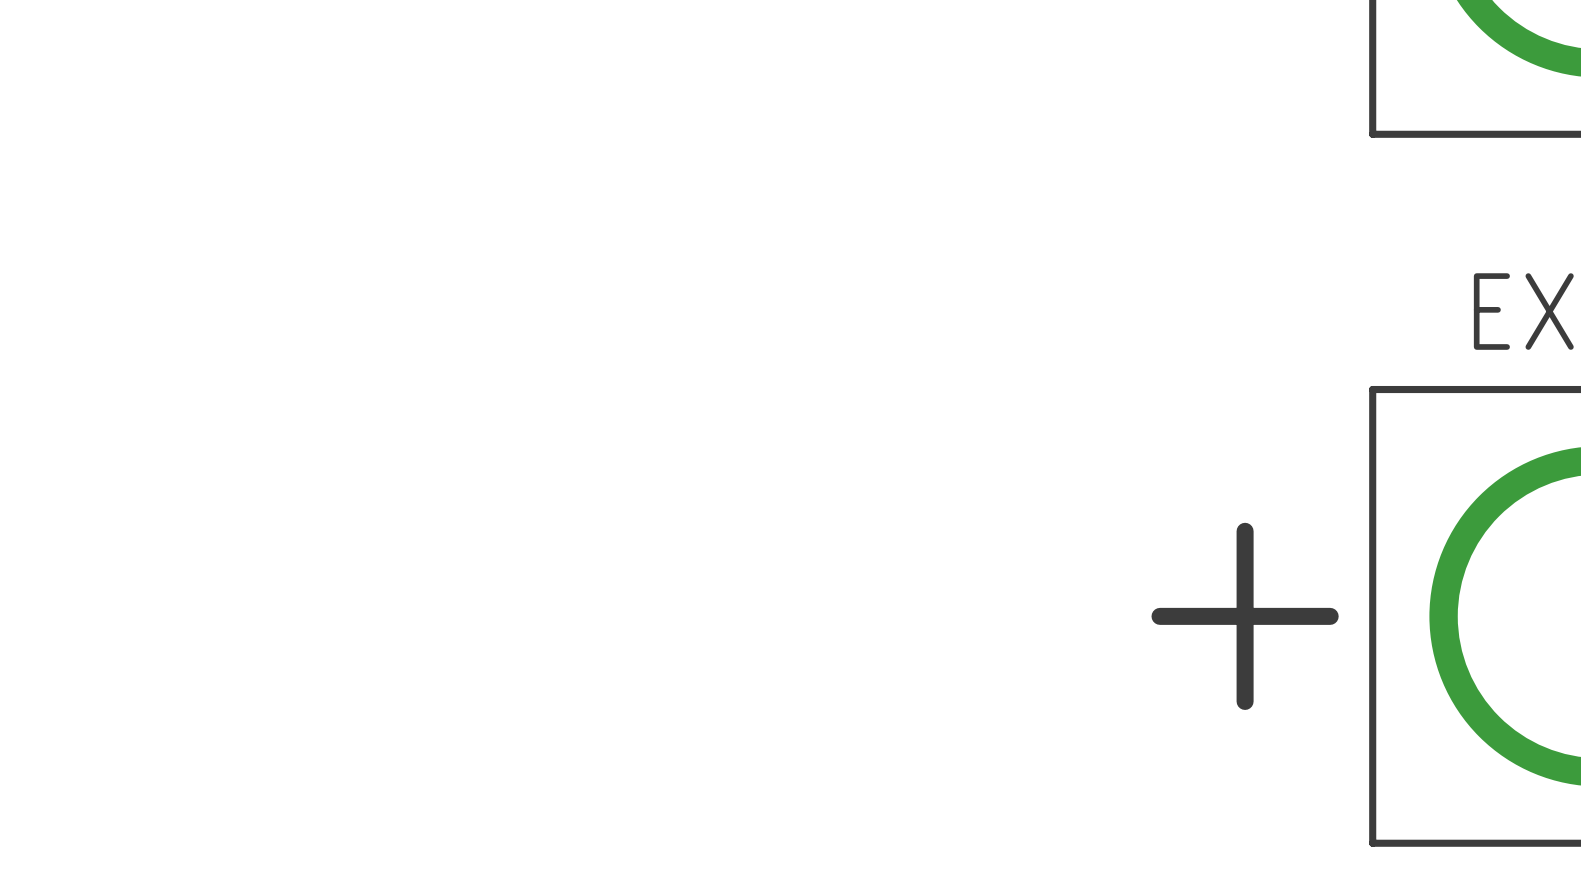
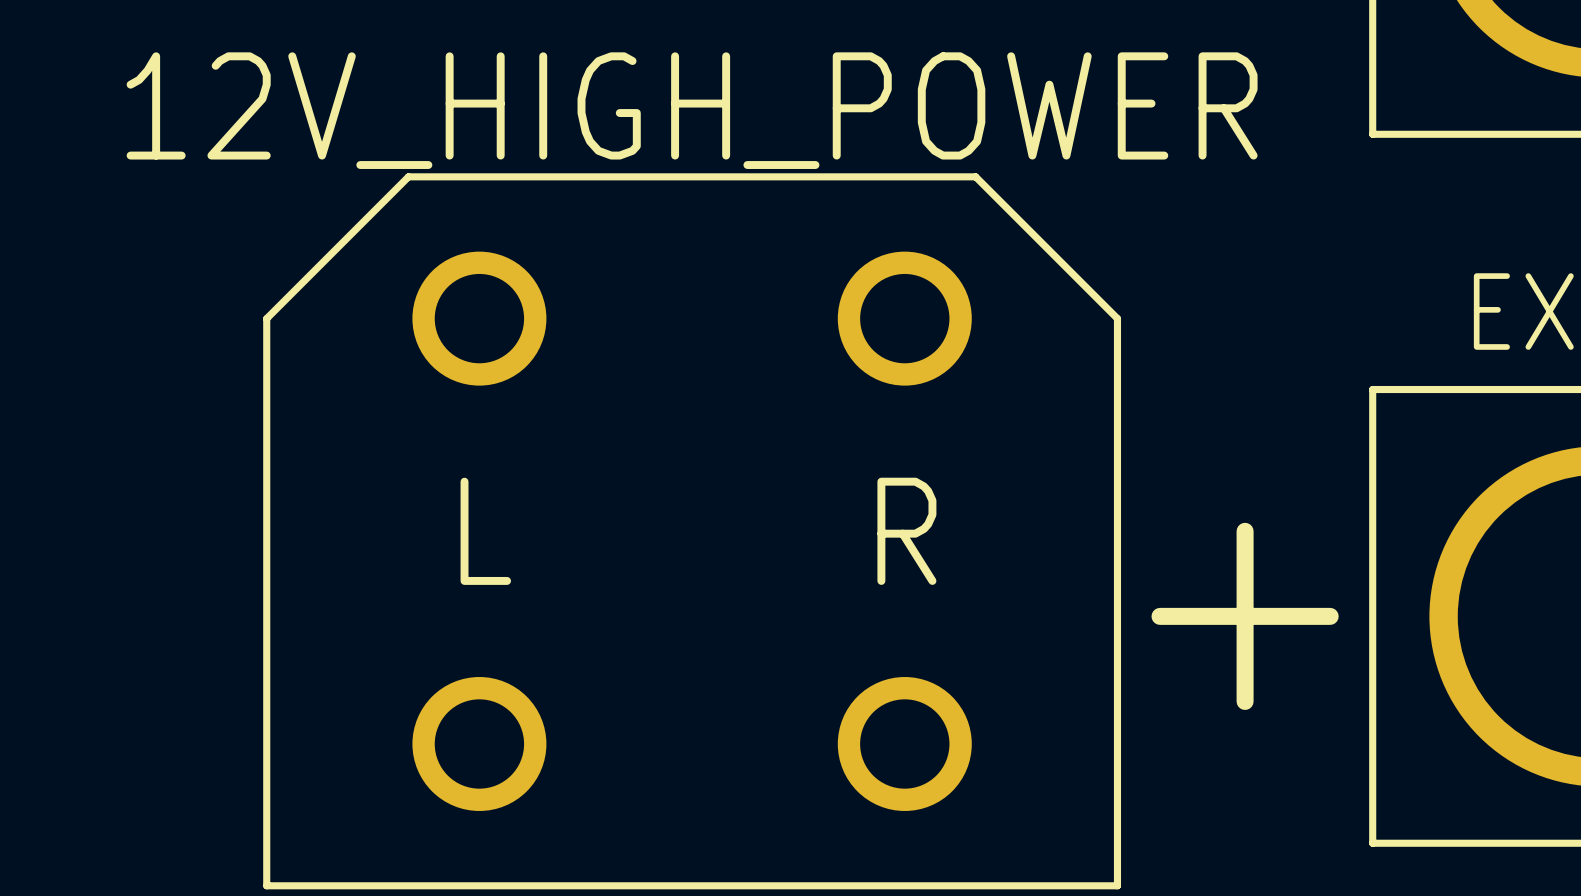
12V_HIGH_POWER: none -> (692, 531)

